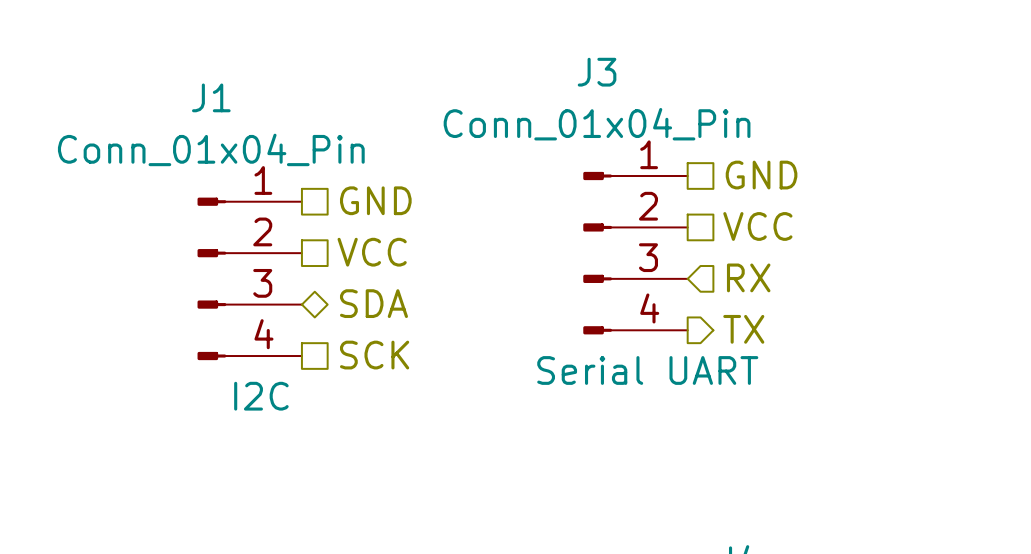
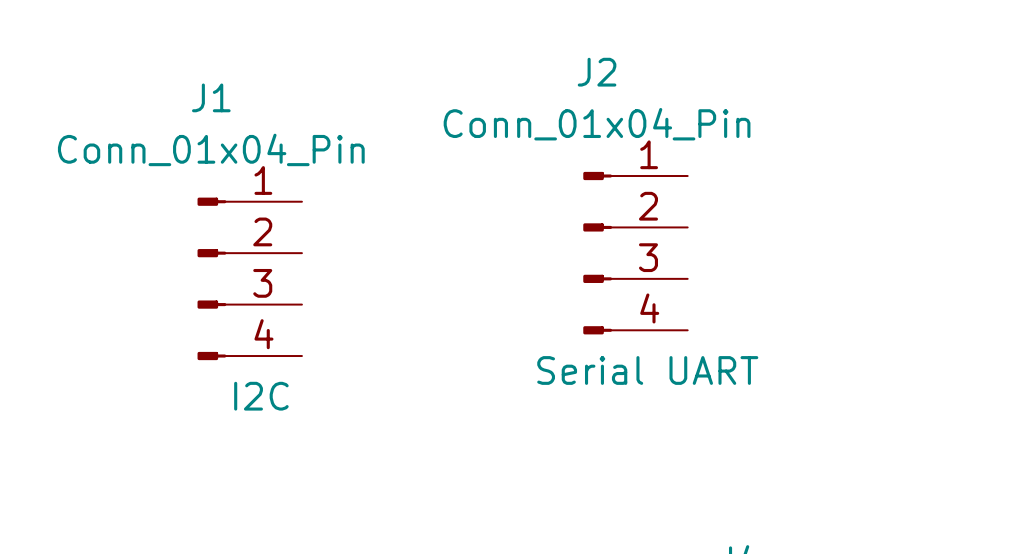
J3 name: J3 (597, 72) -> J2 (597, 72)
hierarchical label: GND (761, 175) -> none
hierarchical label: GND (375, 200) -> none
hierarchical label: VCC (757, 226) -> none
hierarchical label: VCC (372, 252) -> none
hierarchical label: RX (748, 277) -> none
hierarchical label: SDA (373, 303) -> none
hierarchical label: TX (743, 329) -> none
hierarchical label: SCK (374, 355) -> none

